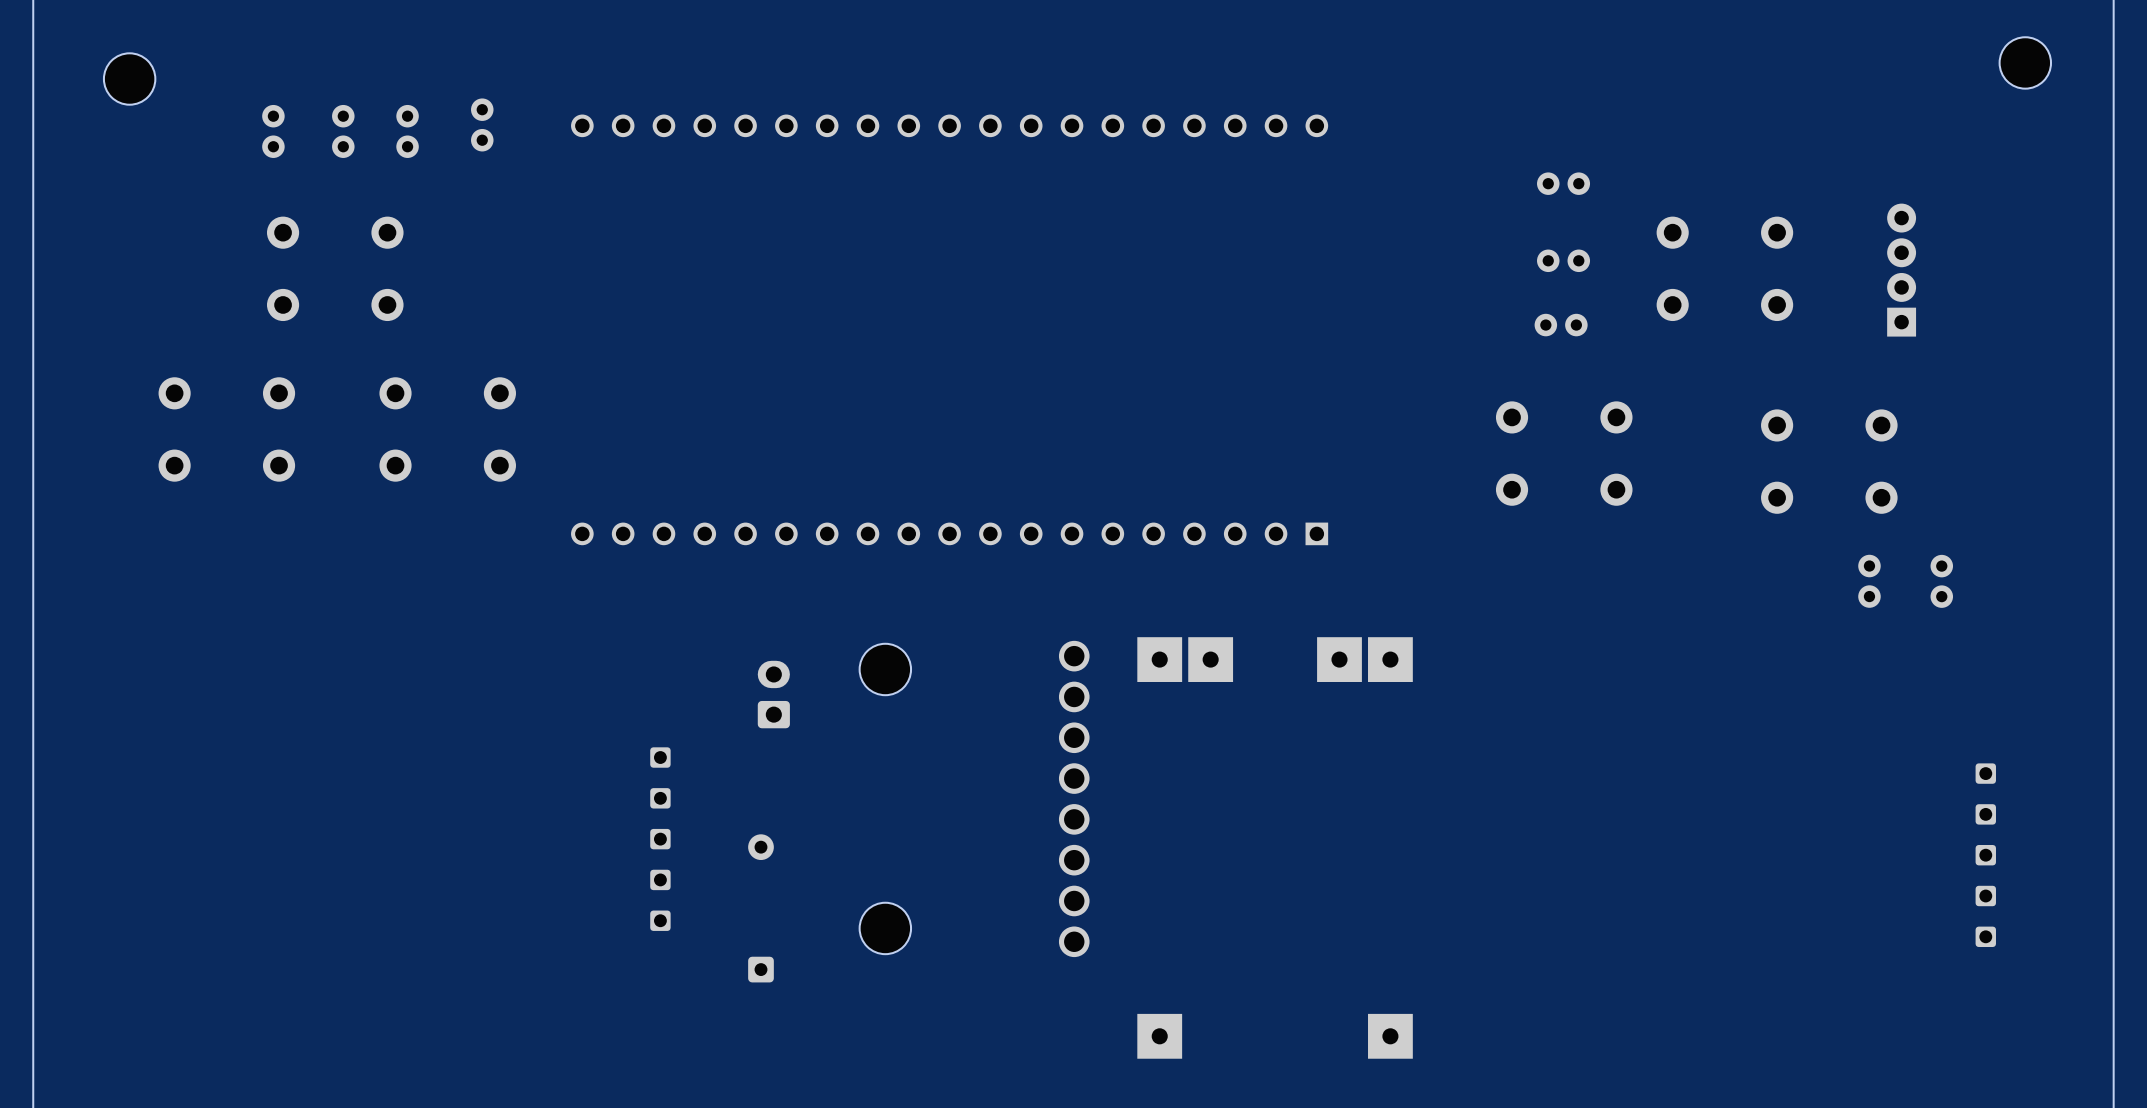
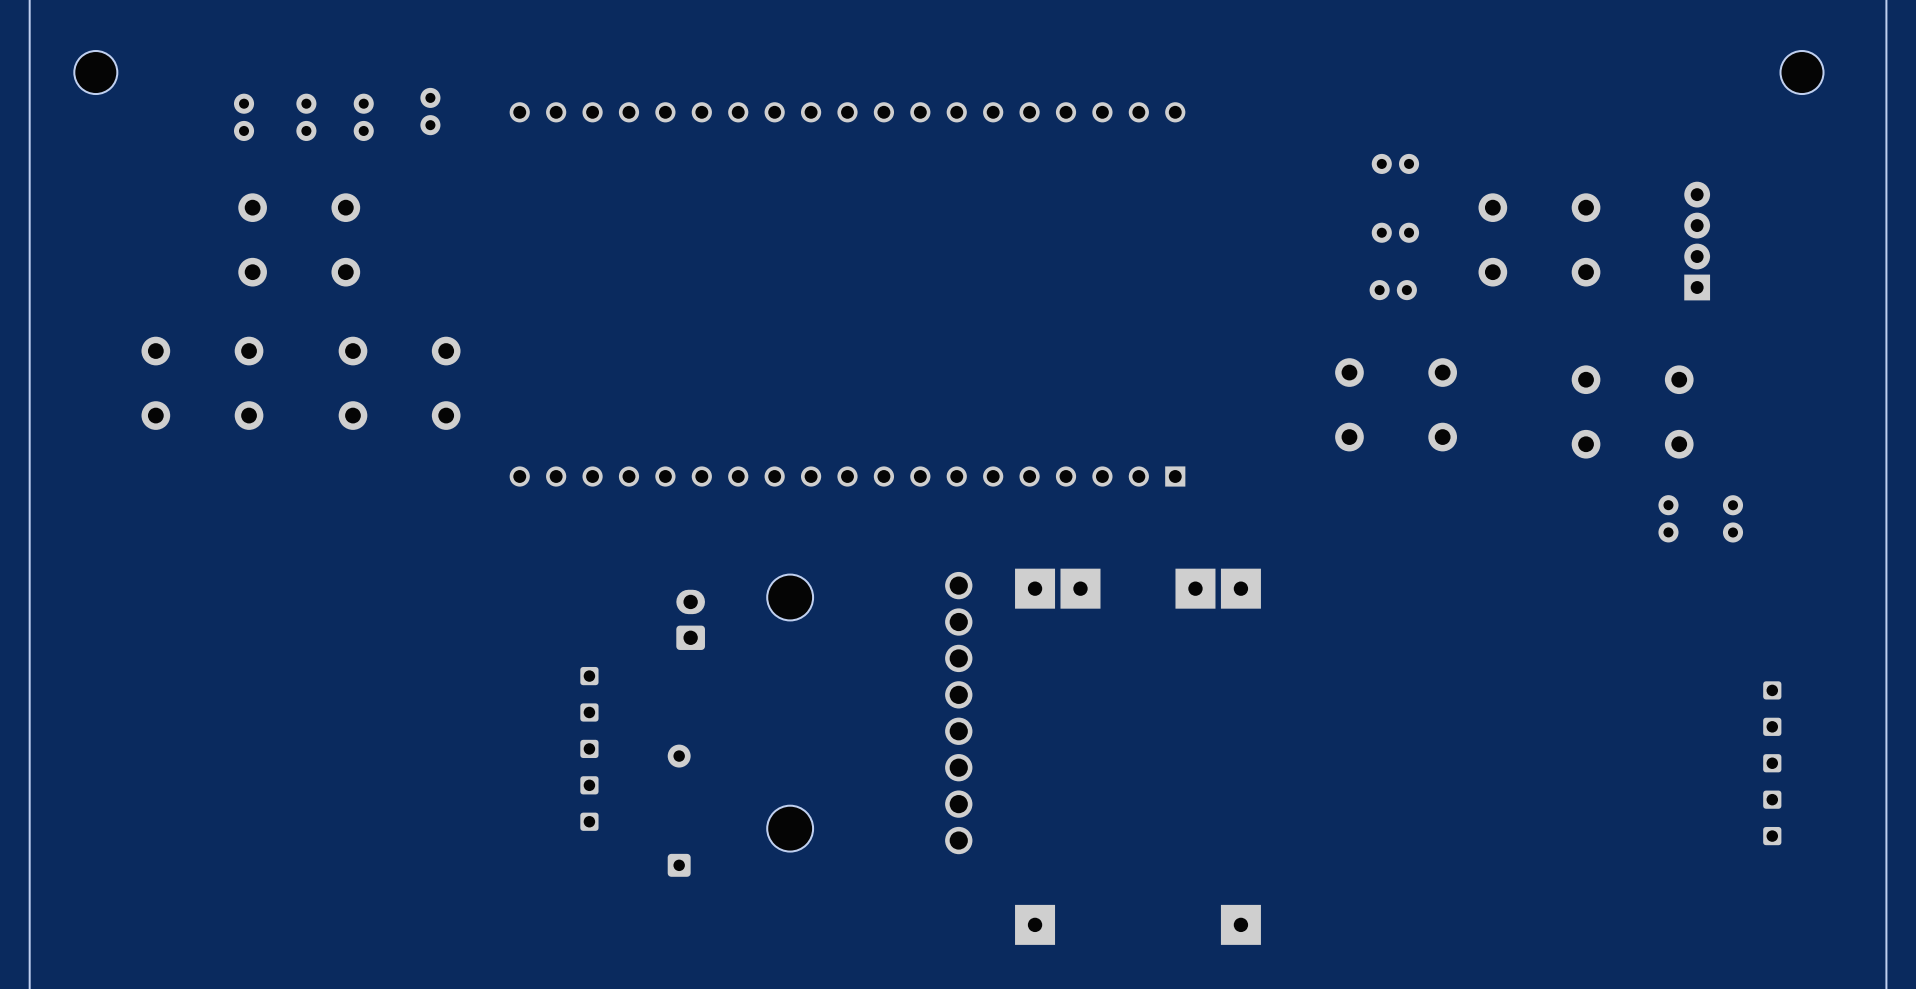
part: (2025, 62) -> none
part: (129, 79) -> none
part: none -> (95, 72)
part: none -> (1802, 72)

